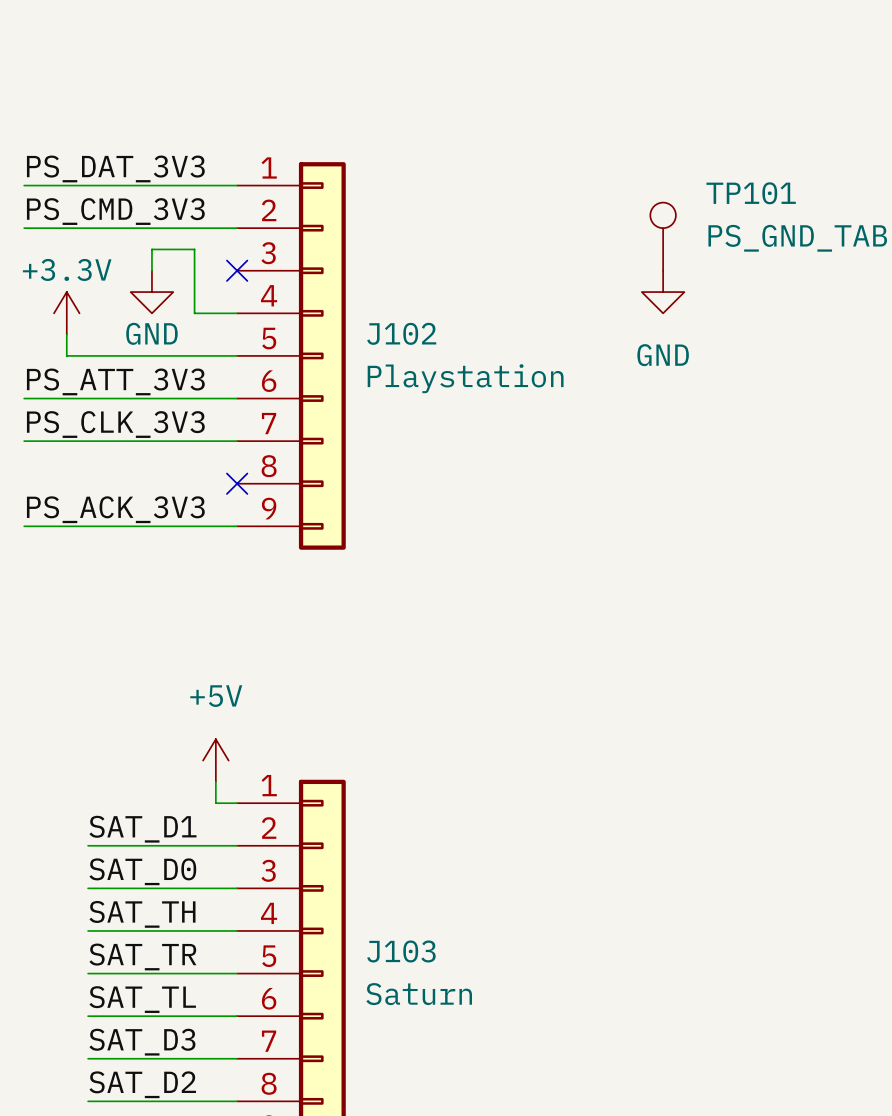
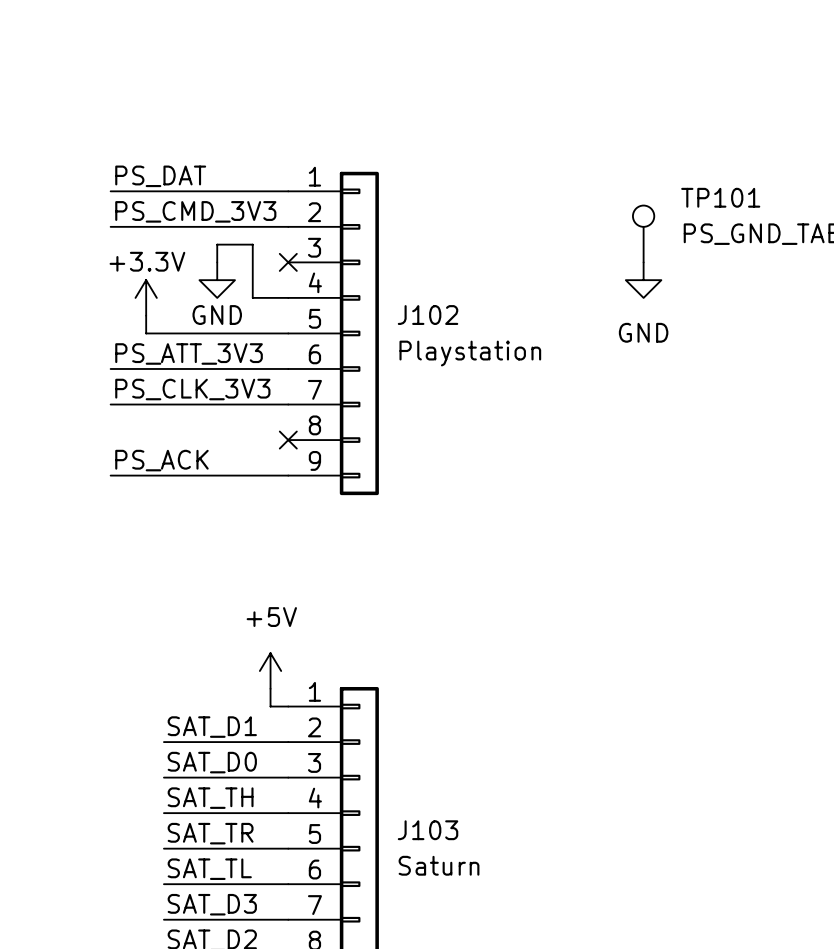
label: PS_DAT_3V3 (115, 168) -> PS_DAT (160, 176)
label: PS_ACK_3V3 (115, 509) -> PS_ACK (161, 460)

